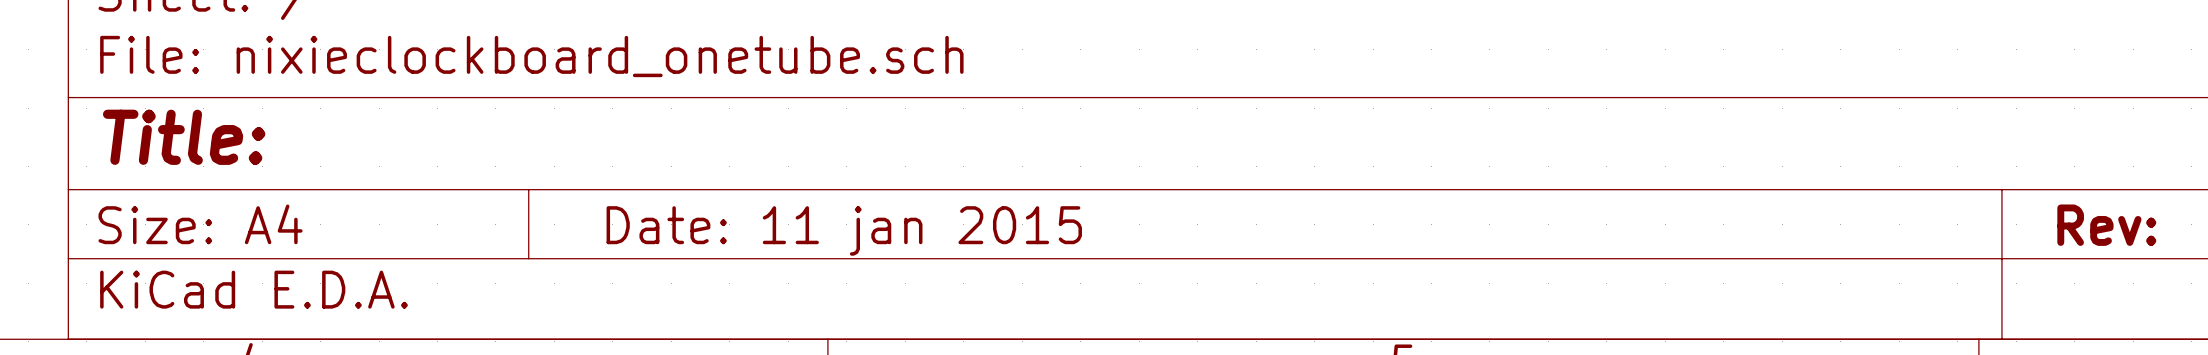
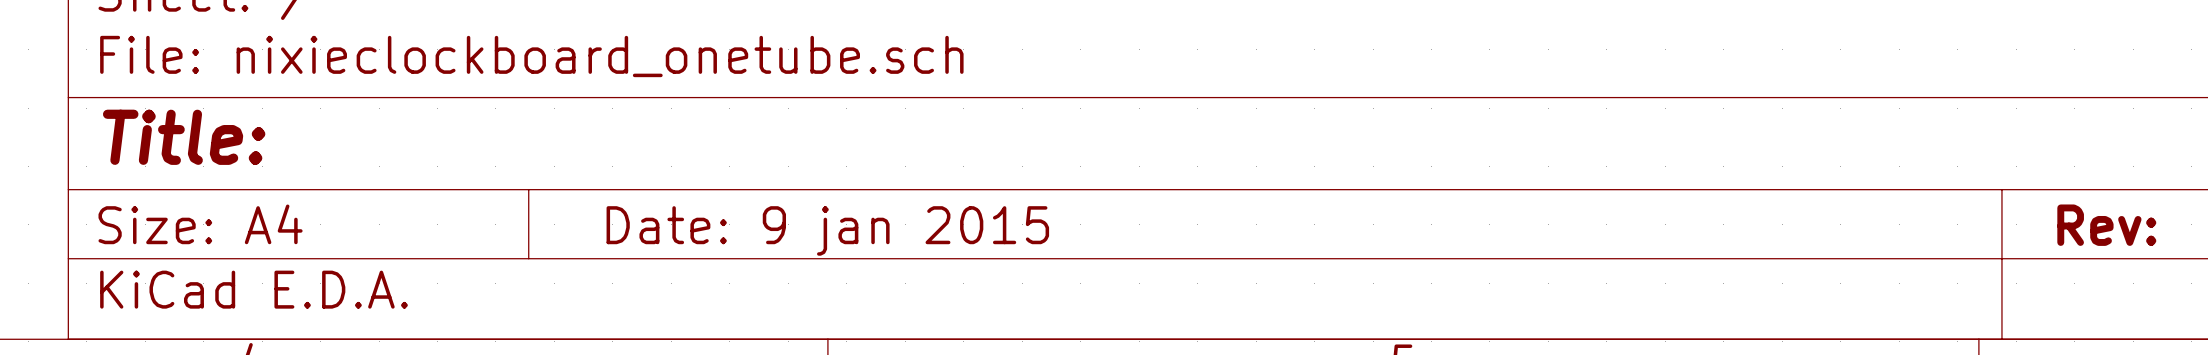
title block: Date: 11 jan 2015 (844, 230) -> Date: 9 jan 2015 (827, 230)

